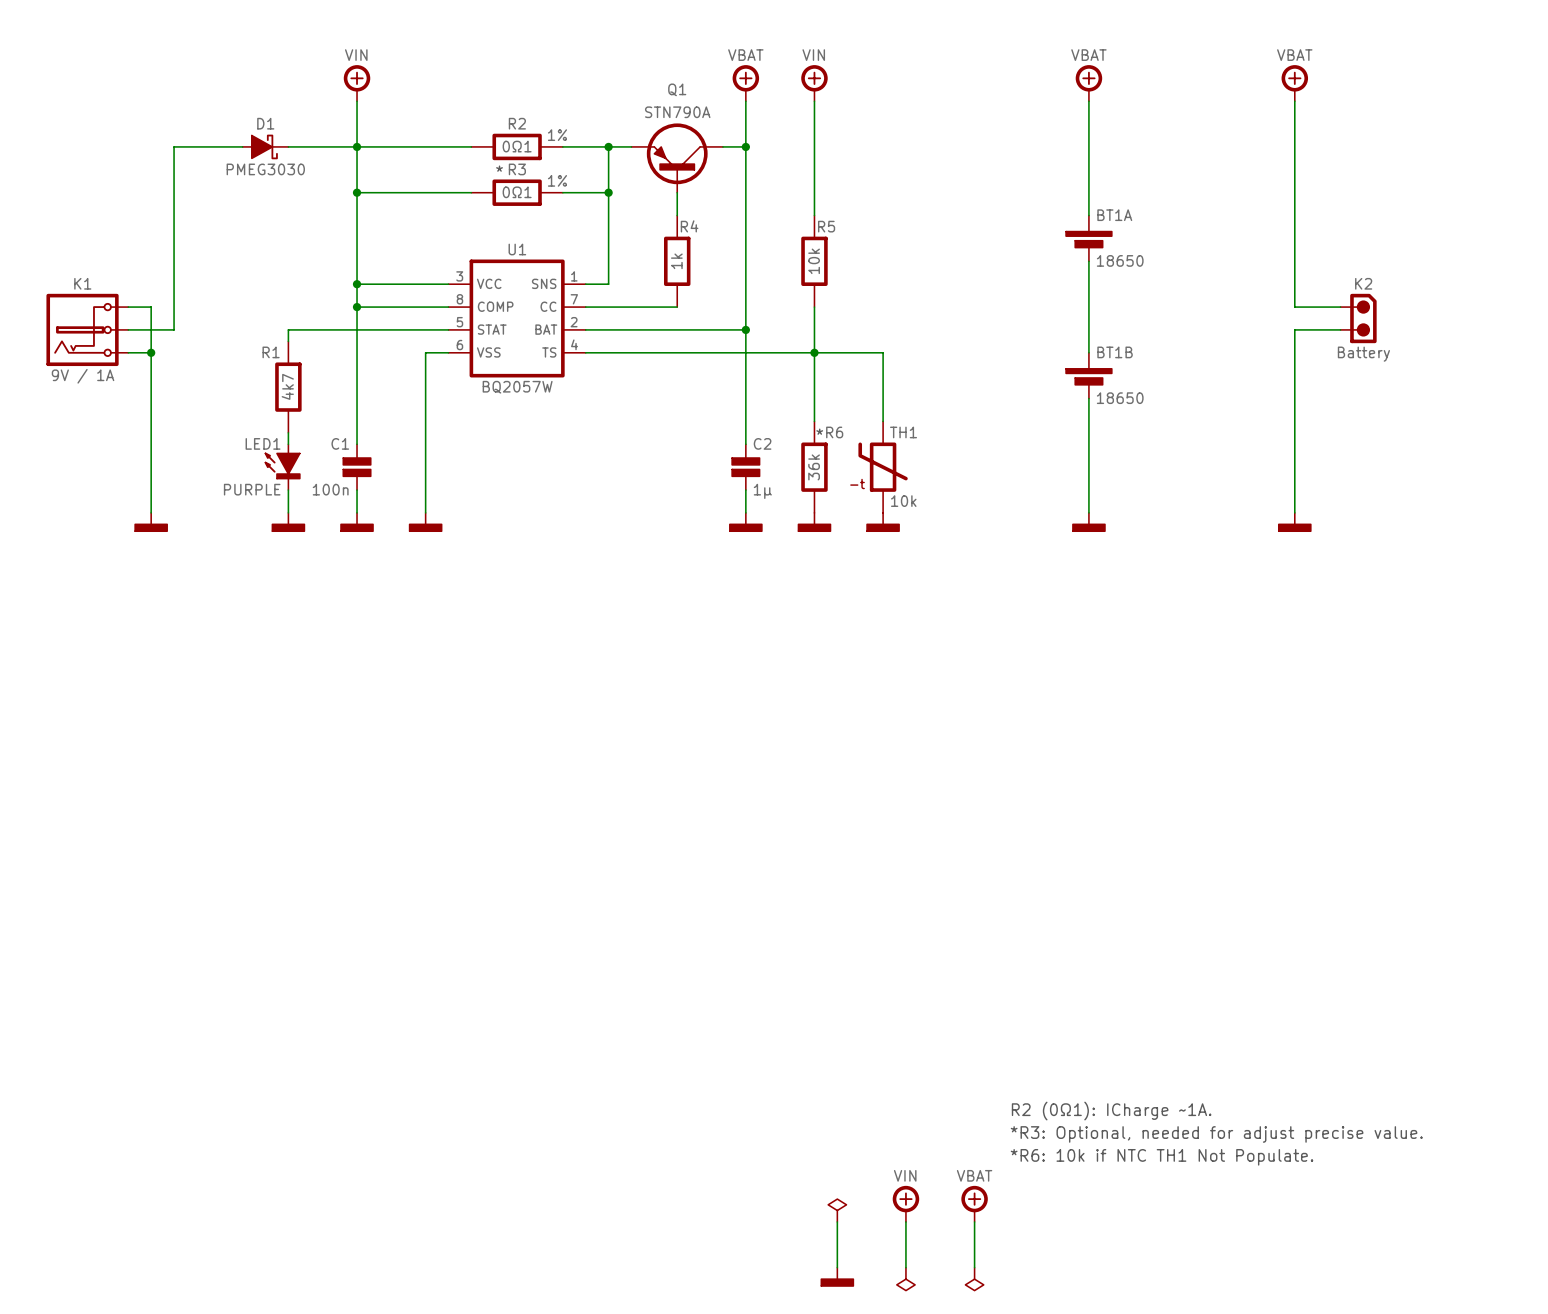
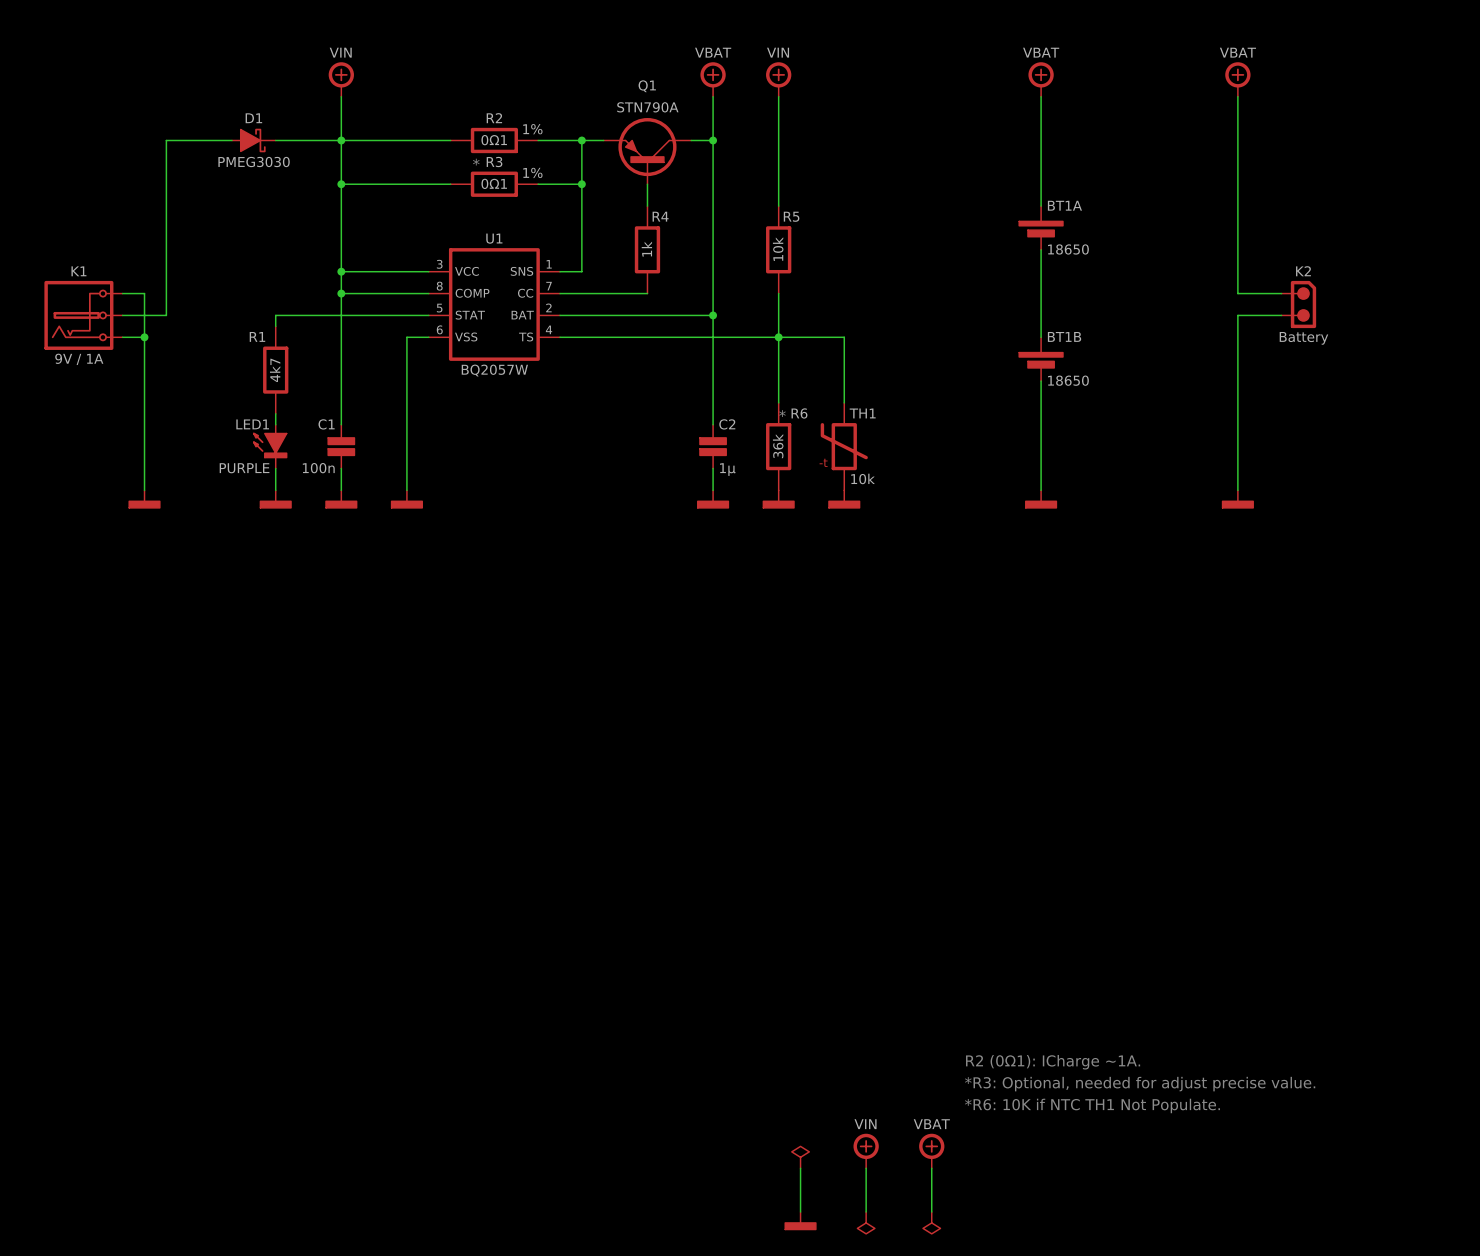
text: *R6: 10k if NTC TH1 Not Populate. (1162, 1157) -> *R6: 10K if NTC TH1 Not Populate. (1092, 1105)

